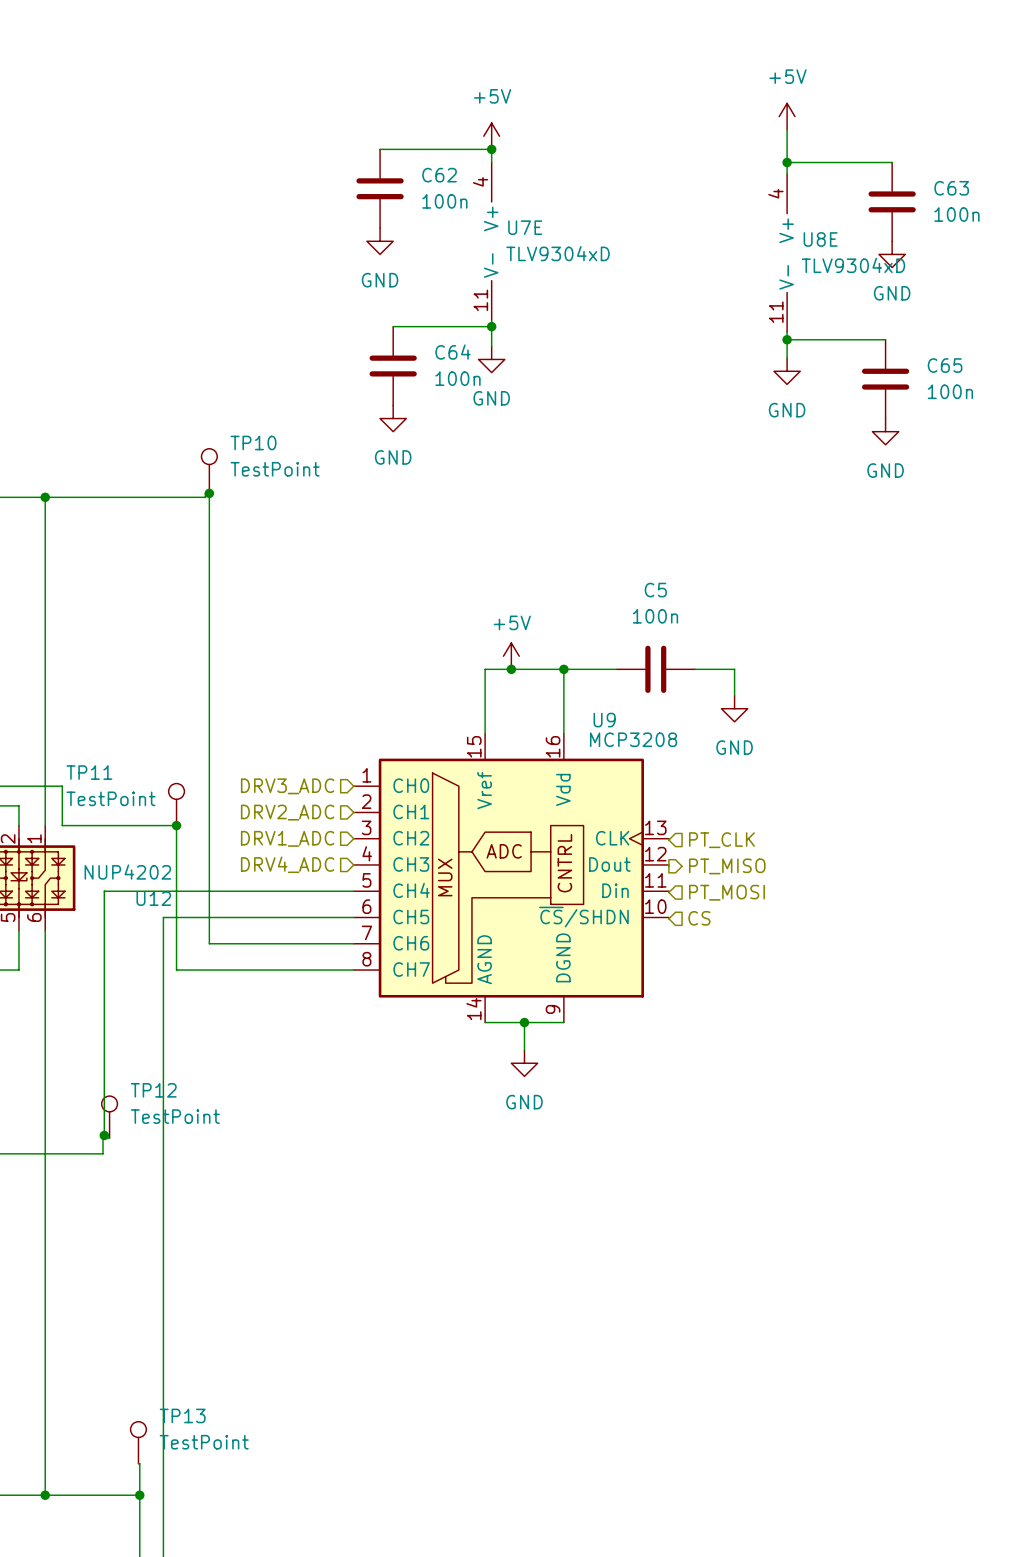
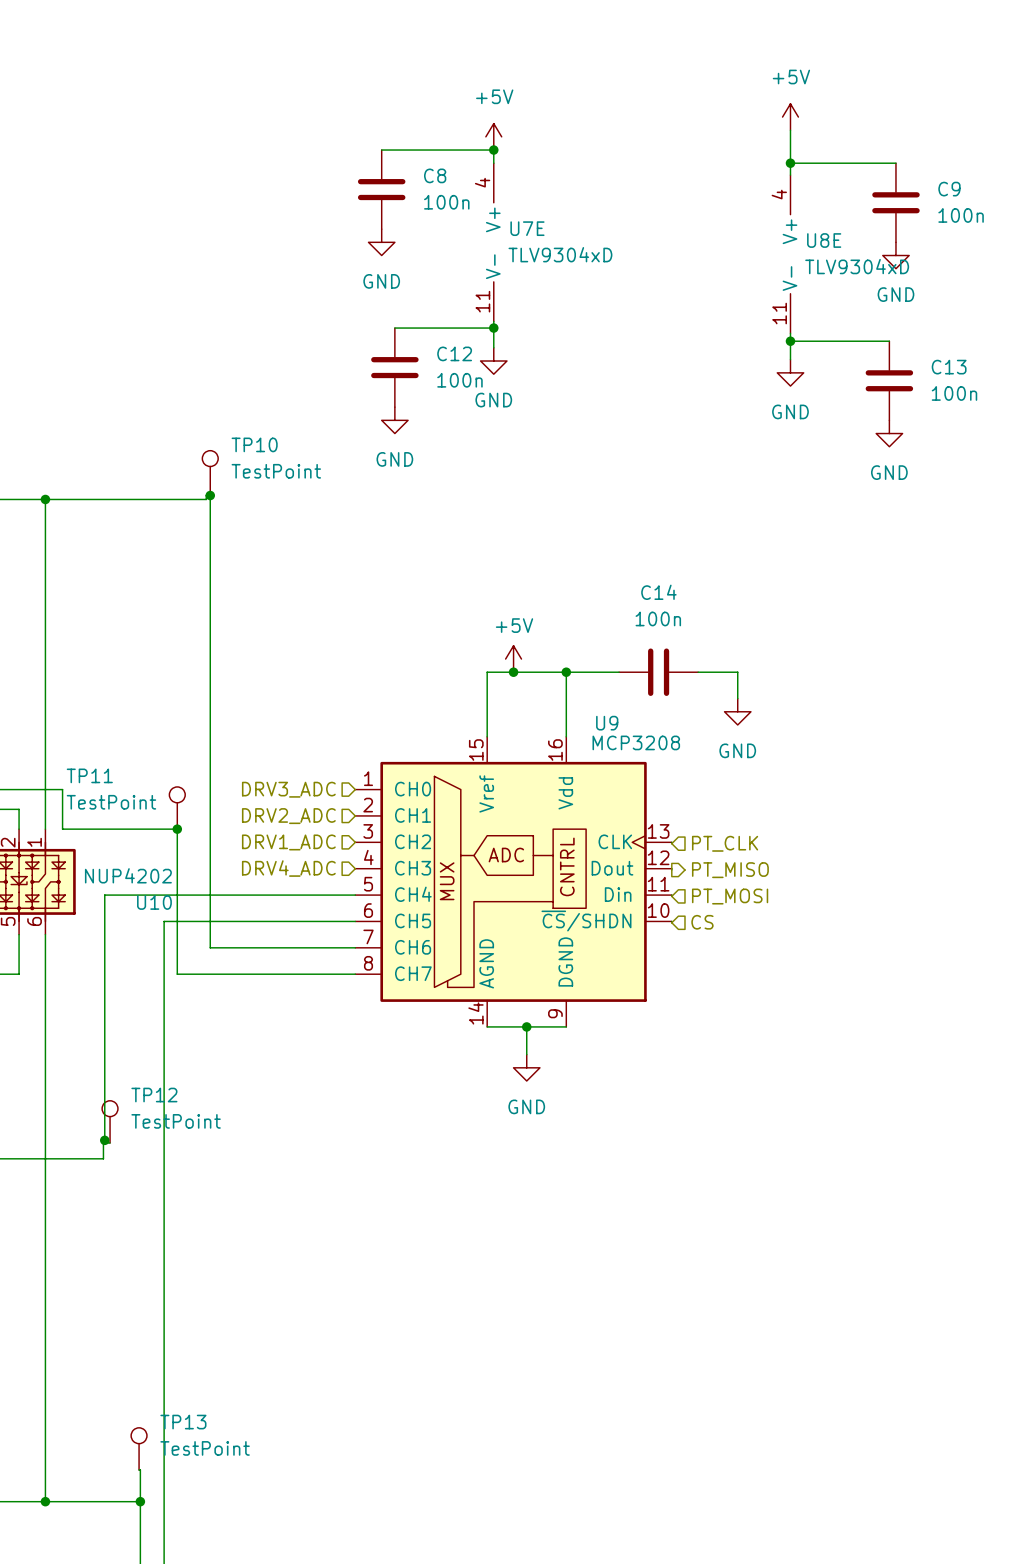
C62 name: C62 (439, 175) -> C8 (435, 175)
C63 name: C63 (951, 188) -> C9 (949, 189)
C64 name: C64 (452, 352) -> C12 (454, 353)
C65 name: C65 (945, 365) -> C13 (949, 367)
C5 name: C5 (655, 590) -> C14 (658, 592)
U12 name: U12 (153, 898) -> U10 (154, 902)

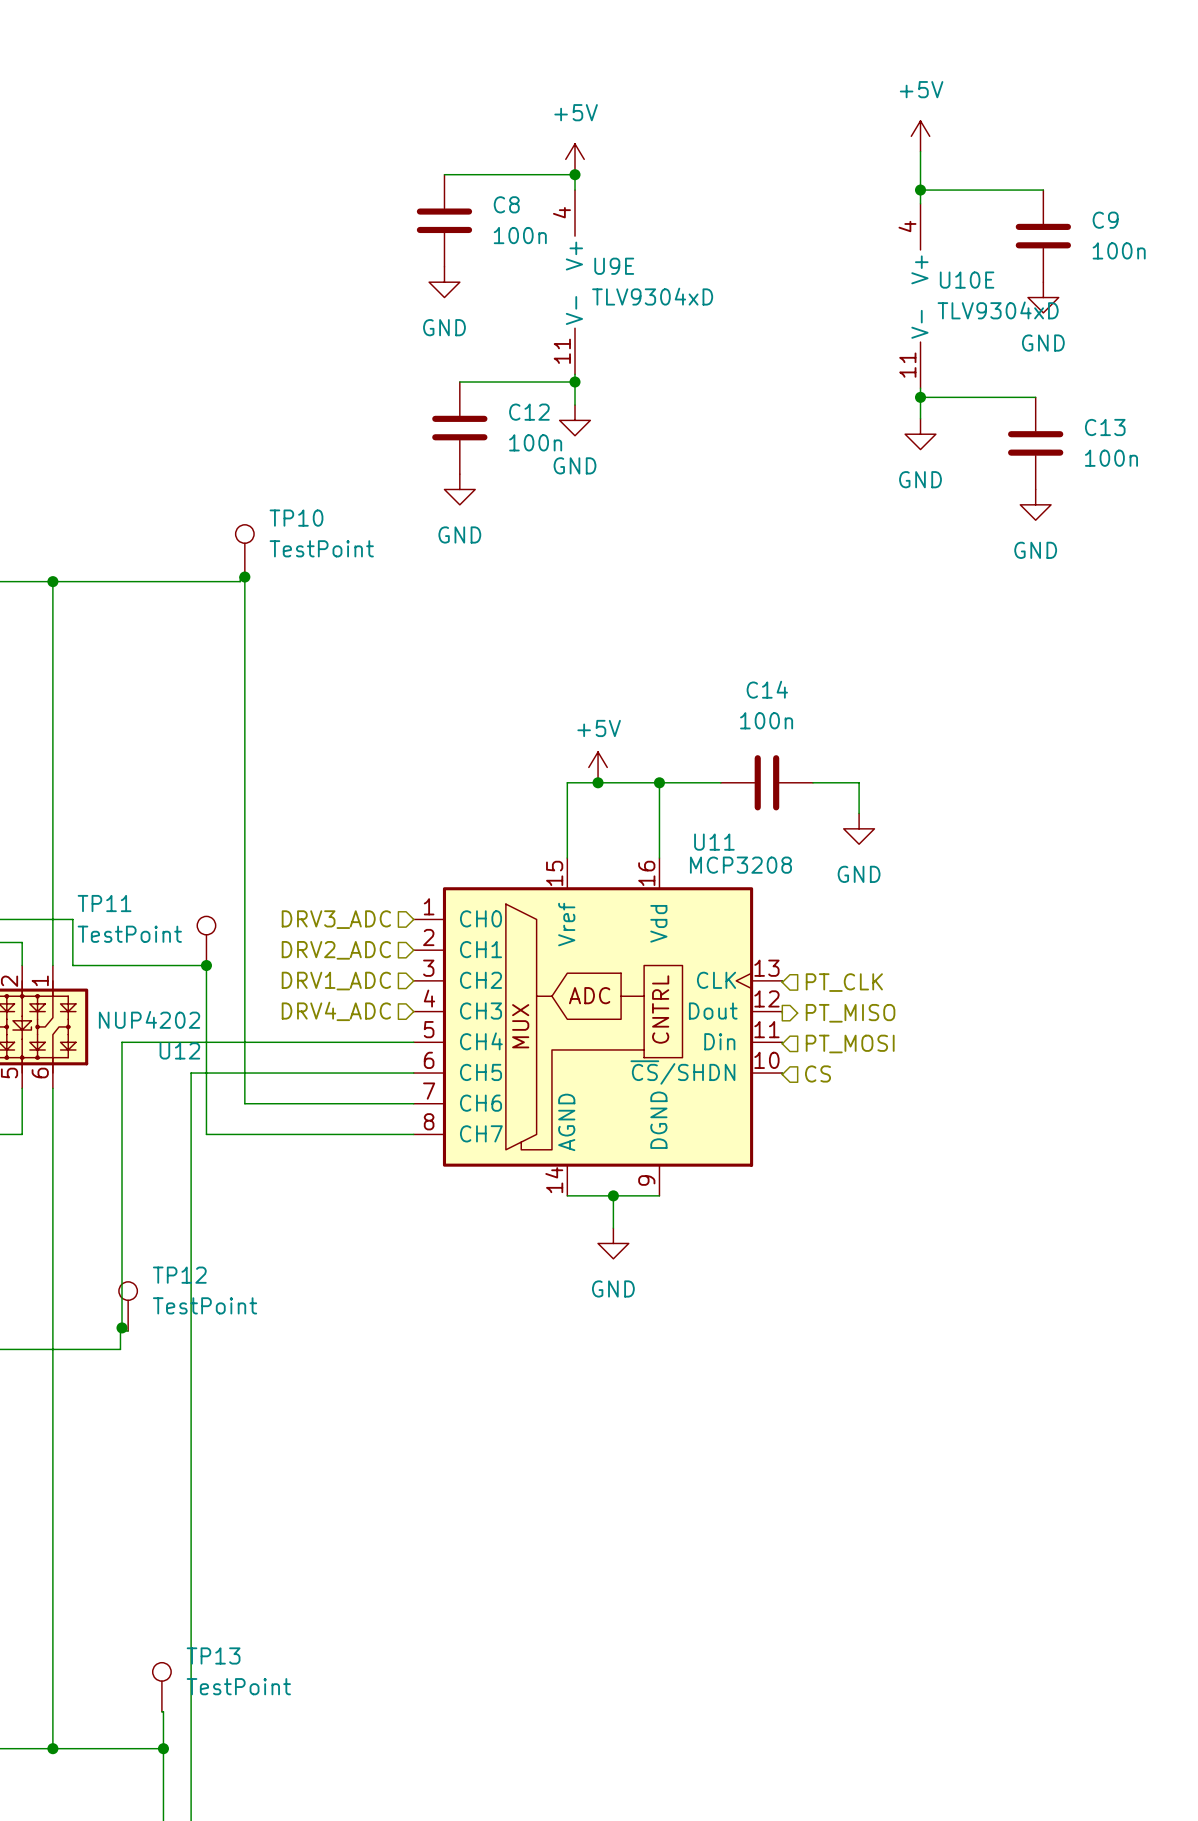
U7E name: U7E (527, 228) -> U9E (614, 266)
U8E name: U8E (824, 240) -> U10E (967, 280)
U9 name: U9 (607, 723) -> U11 (714, 842)
U10 name: U10 (154, 902) -> U12 (179, 1050)

